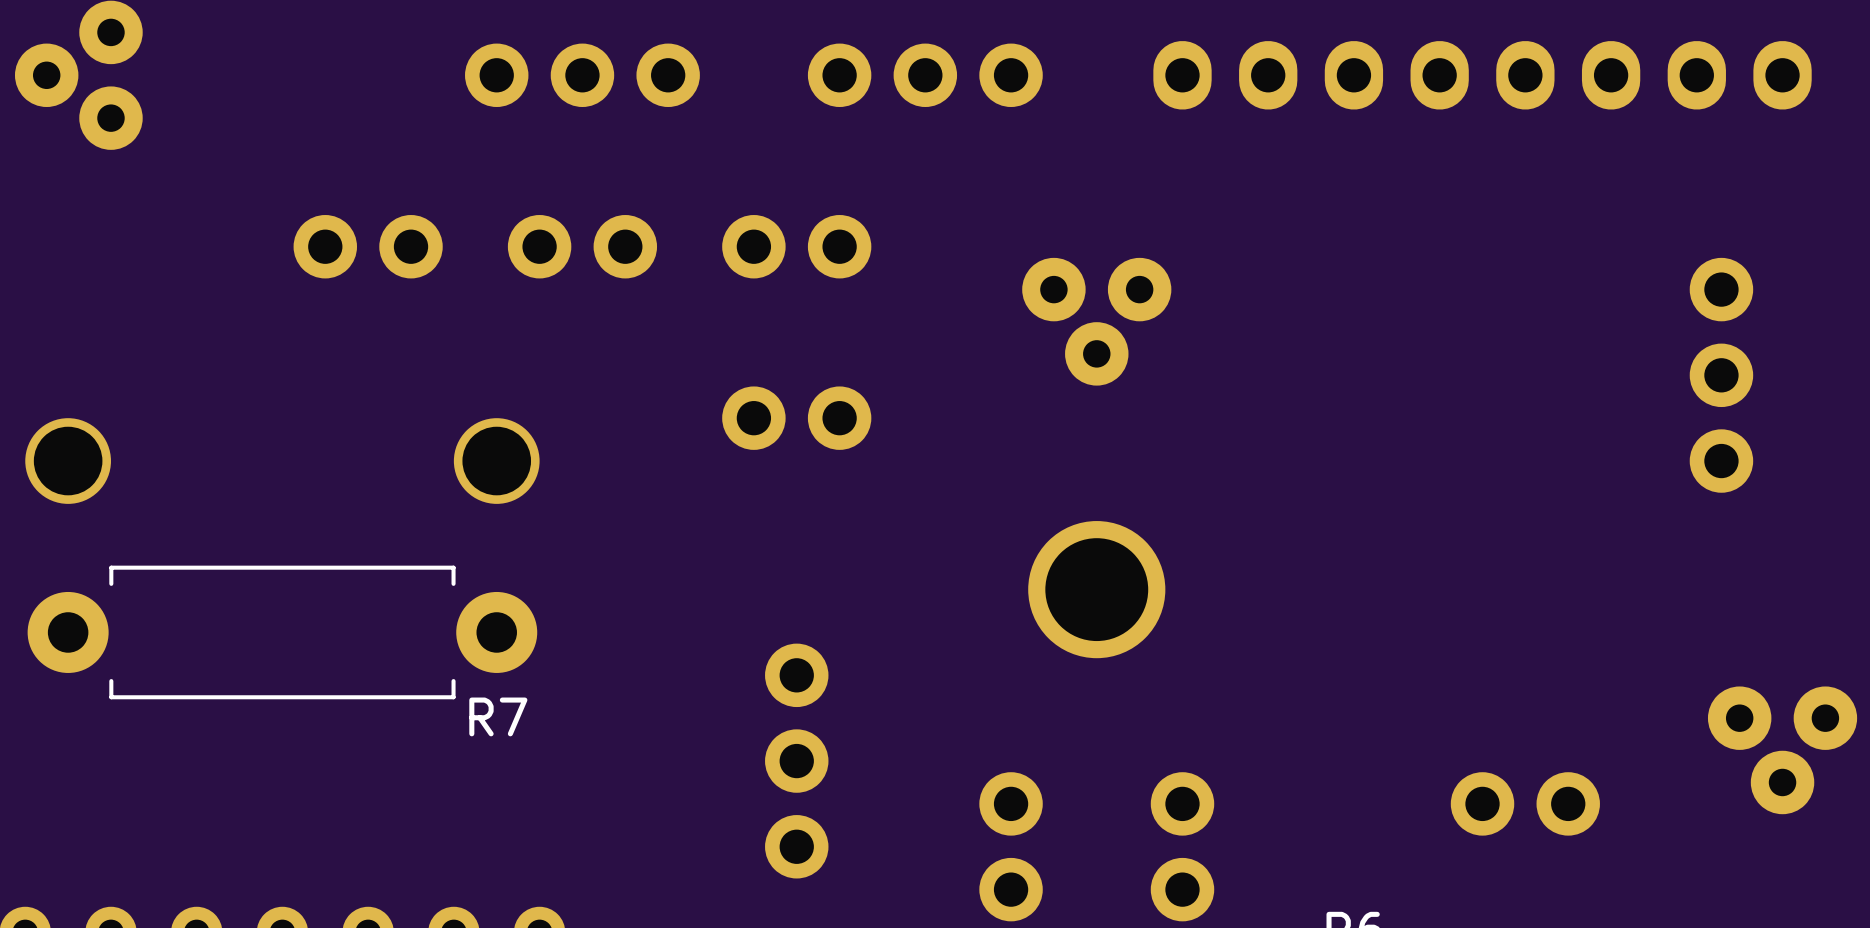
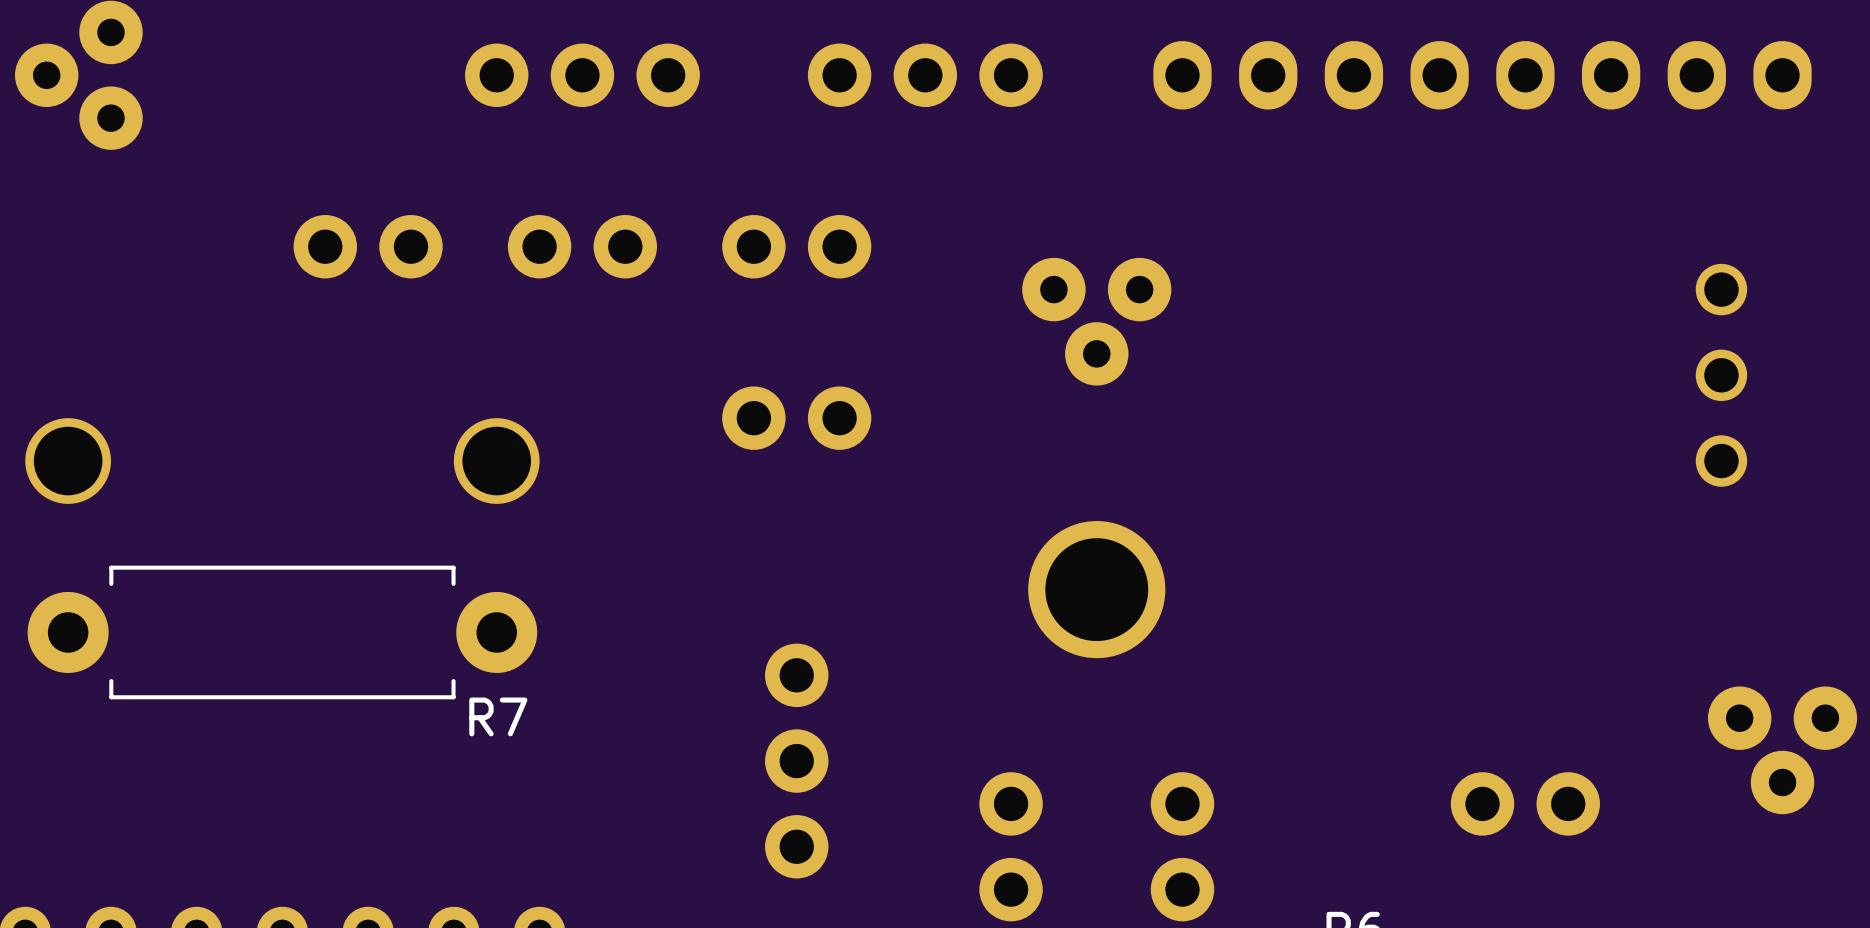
part footprint: [1689, 257, 1754, 493] -> [1695, 263, 1748, 487]

